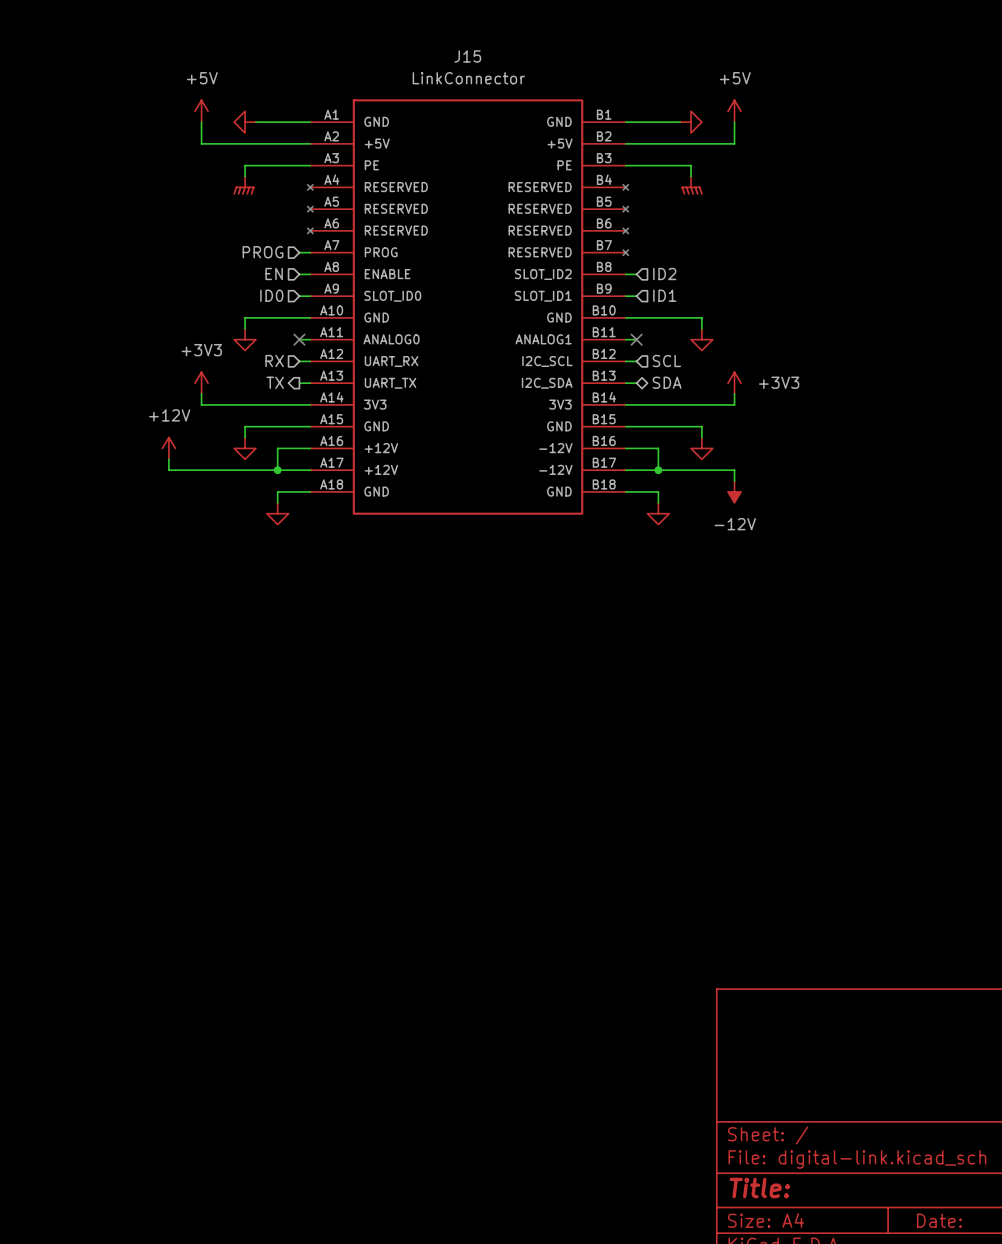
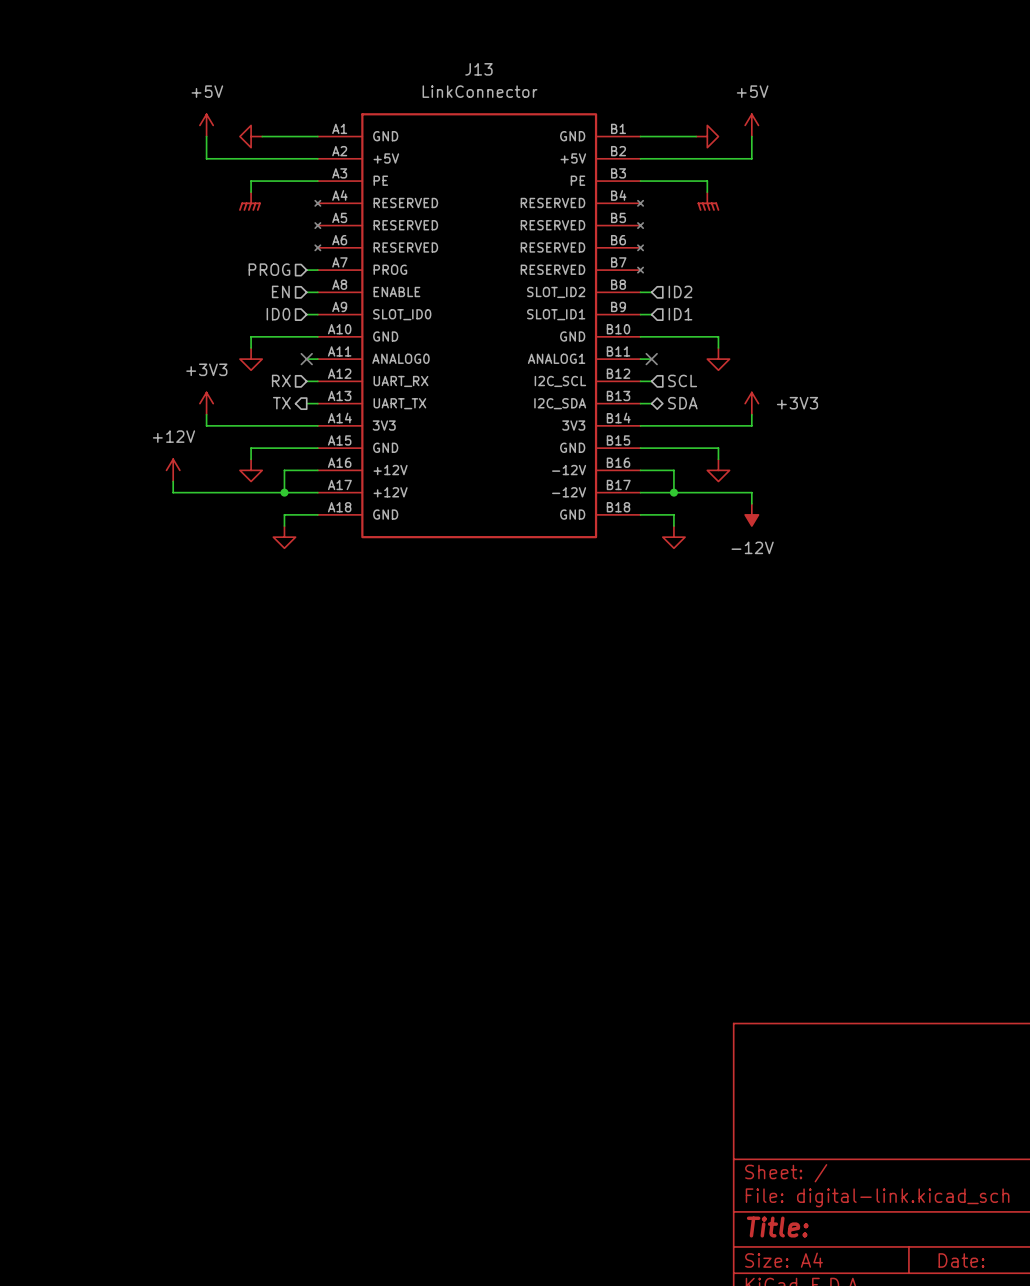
J15 name: J15 (467, 56) -> J13 (478, 69)

